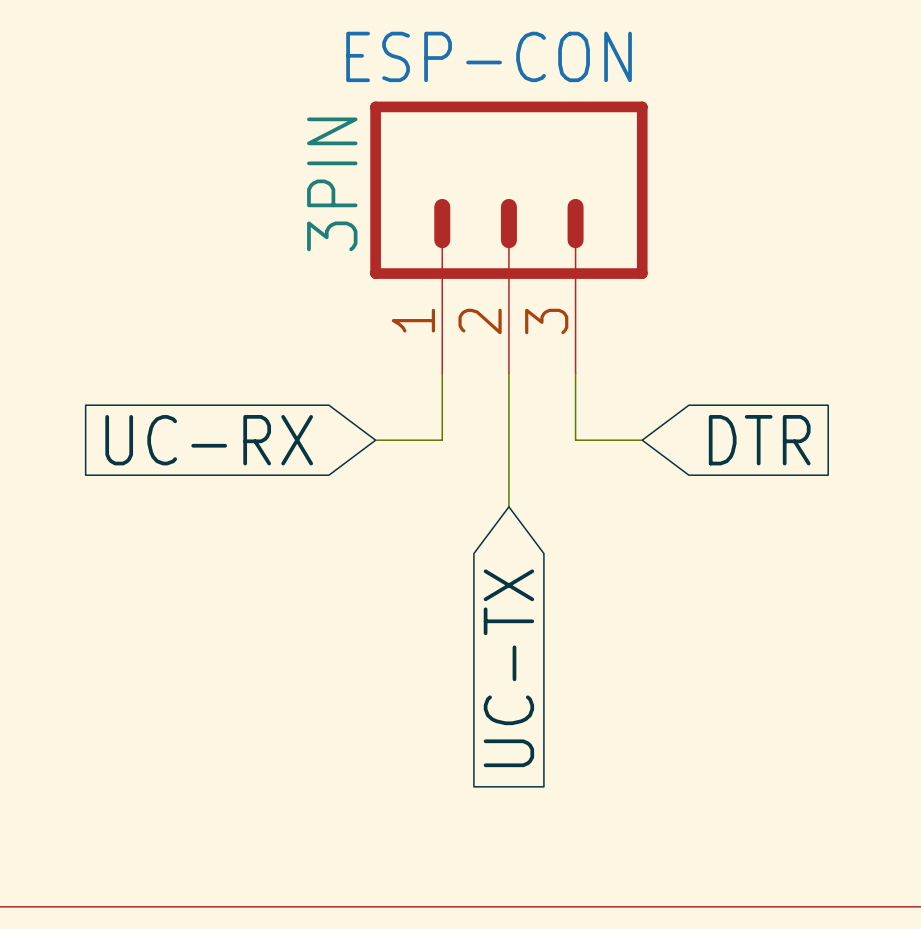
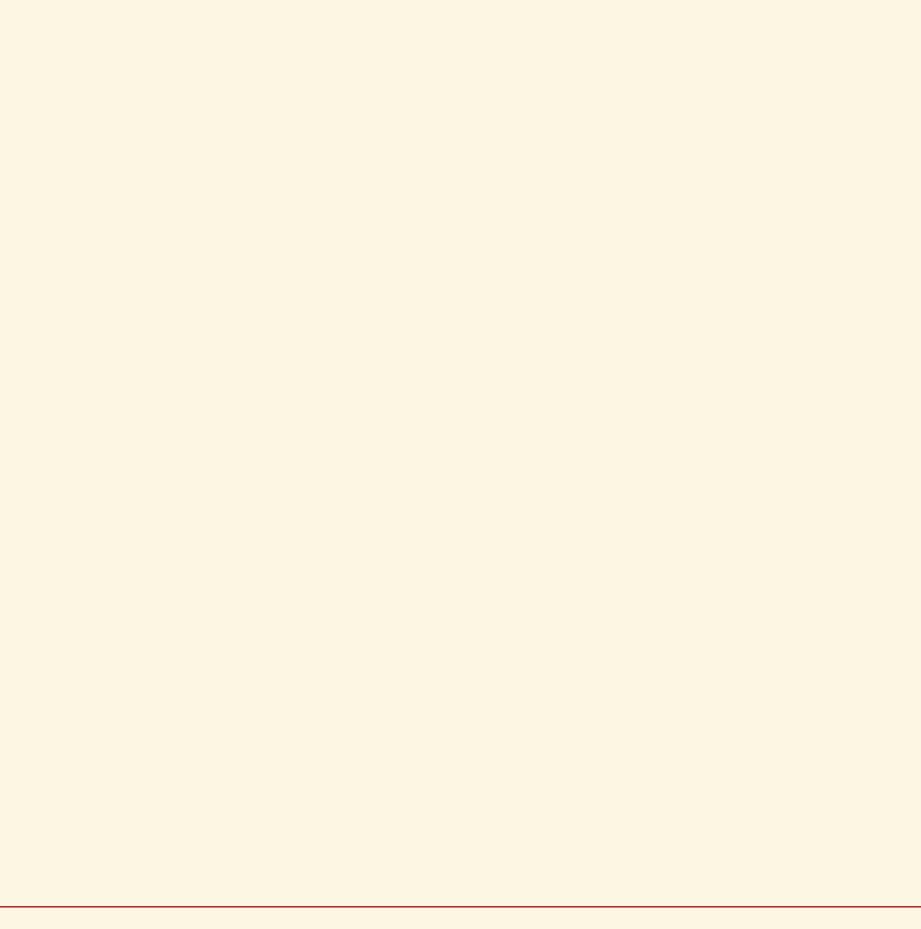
ESP-CON: 3PIN (508, 237) -> none
wire: (442, 373) (442, 440) (375, 440) -> none
wire: (508, 373) (508, 506) -> none
wire: (575, 373) (575, 440) (642, 440) -> none
global label: UC-RX (209, 440) -> none
global label: DTR (759, 440) -> none
global label: UC-TX (508, 668) -> none

